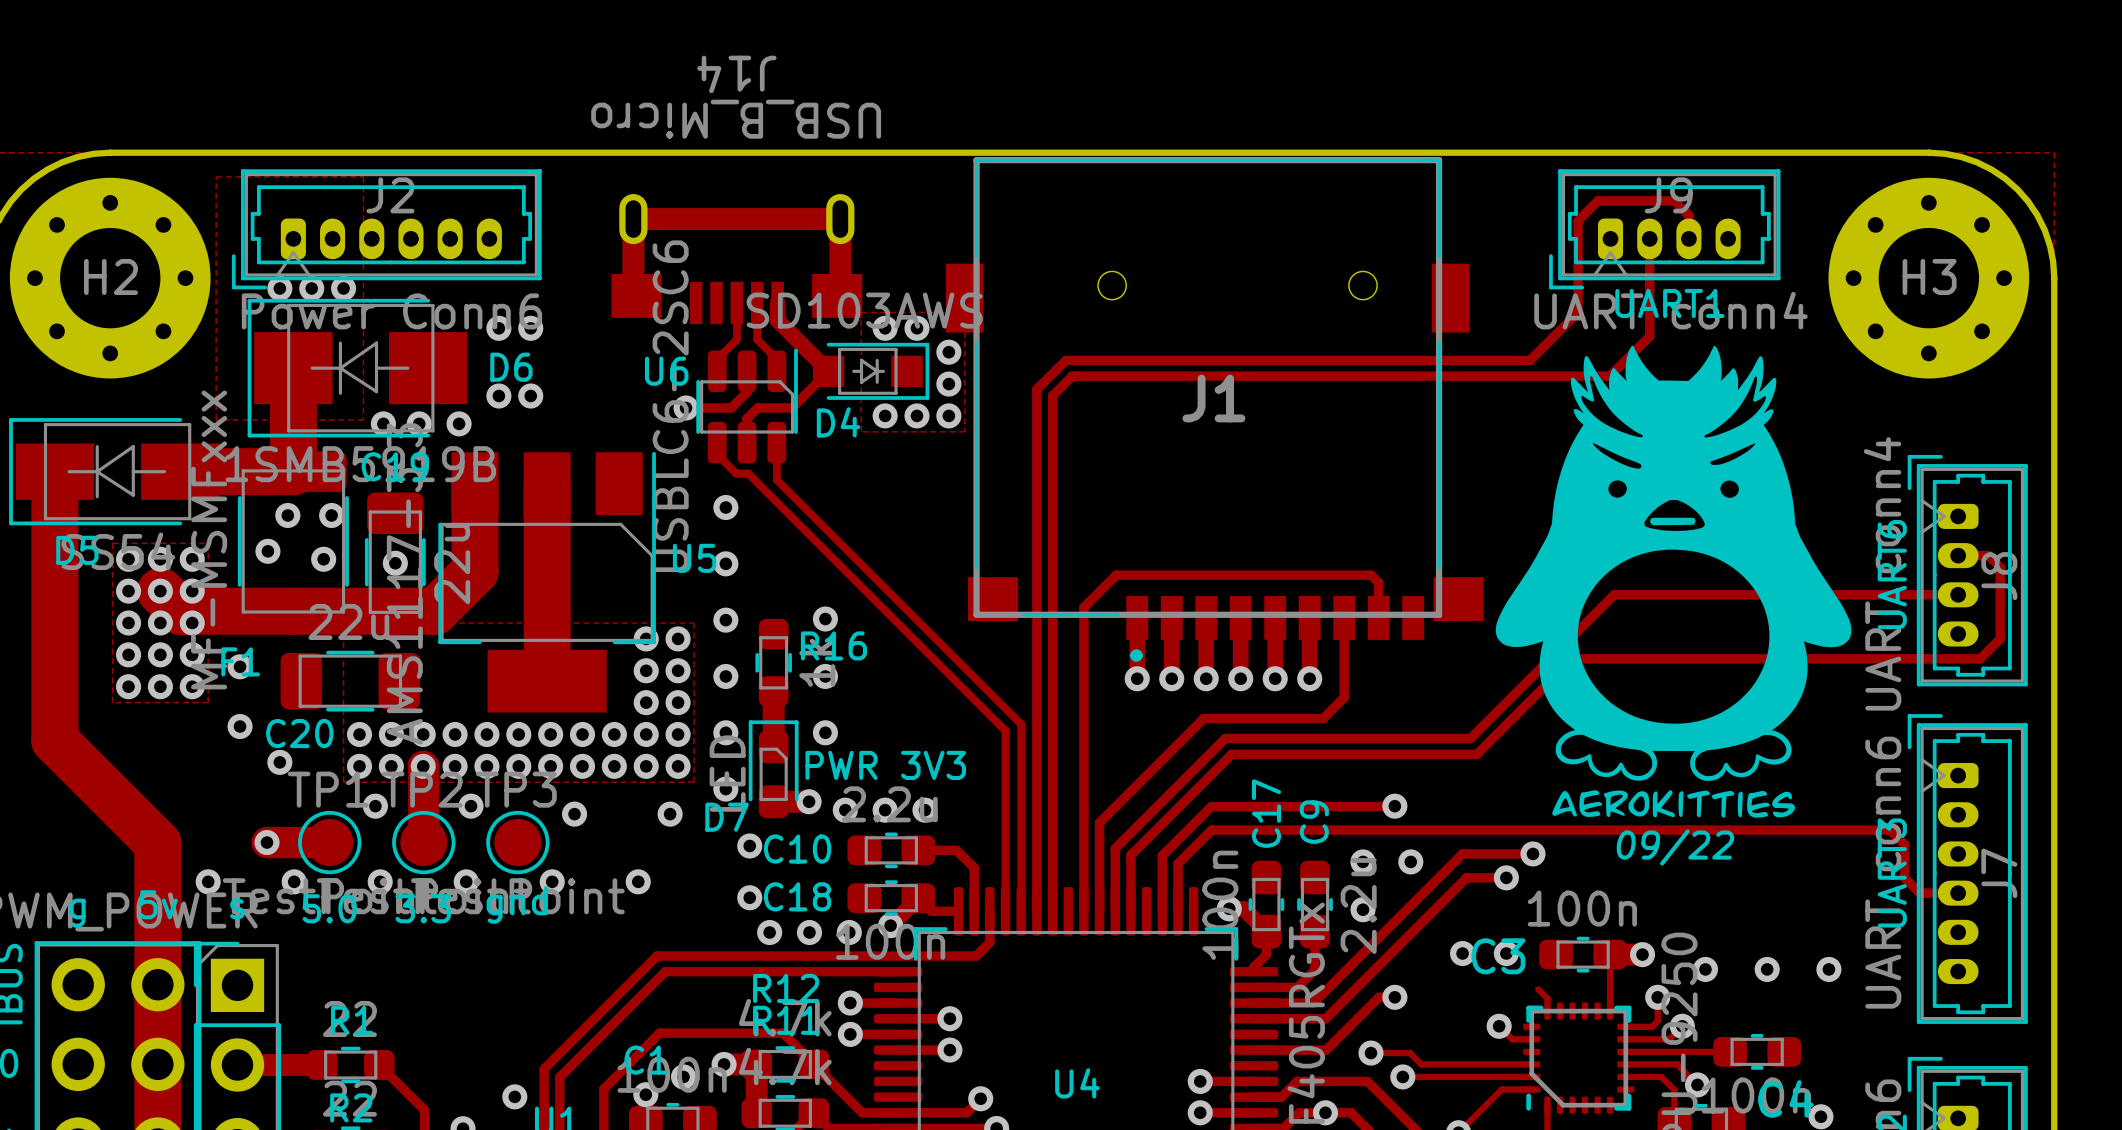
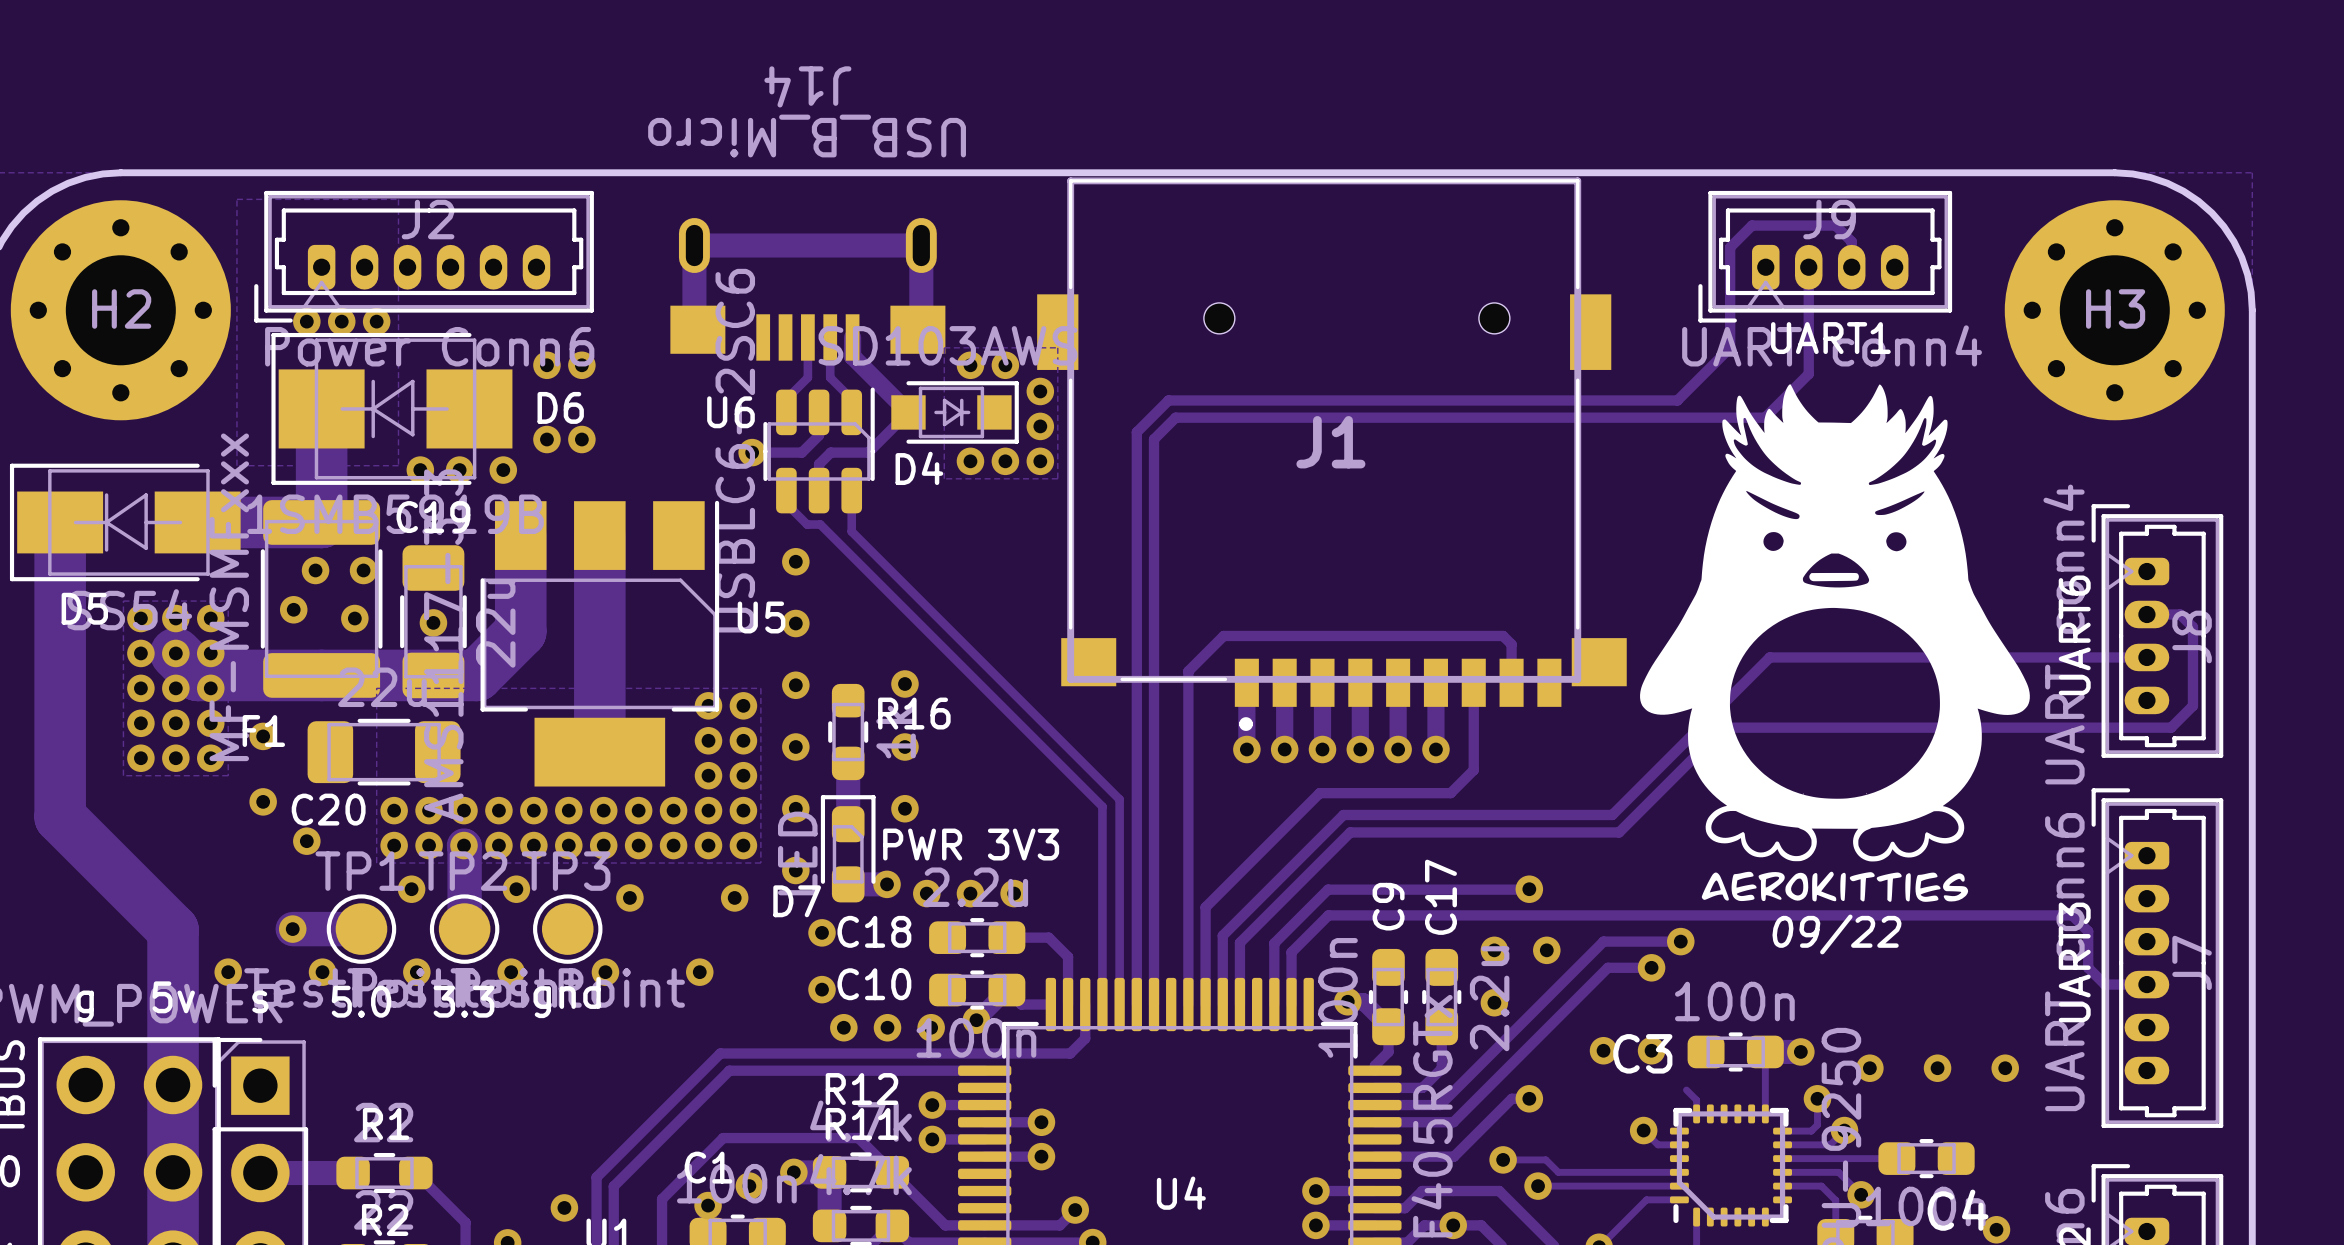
C17 name position: C17 (1266, 813) -> C17 (1440, 897)
C9 name position: C9 (1314, 822) -> C9 (1388, 906)
C10 name position: C10 (797, 849) -> C10 (874, 984)
C18 name position: C18 (797, 896) -> C18 (874, 931)

